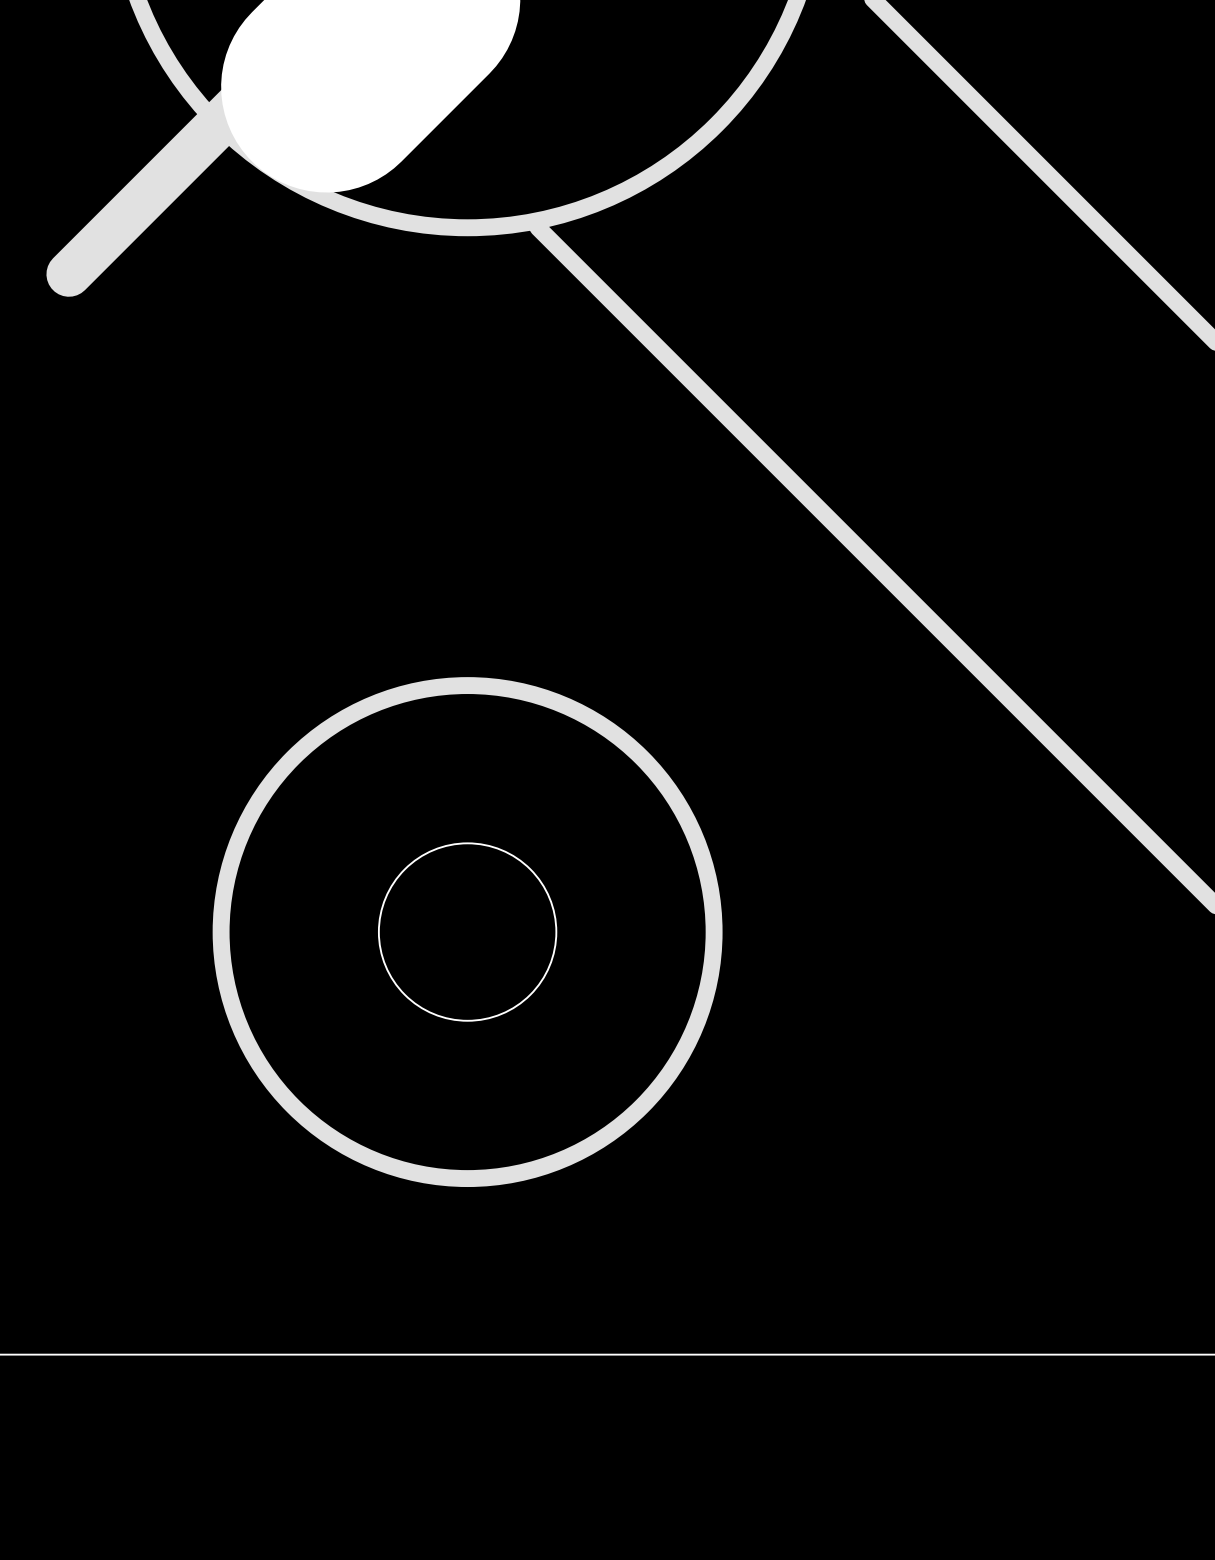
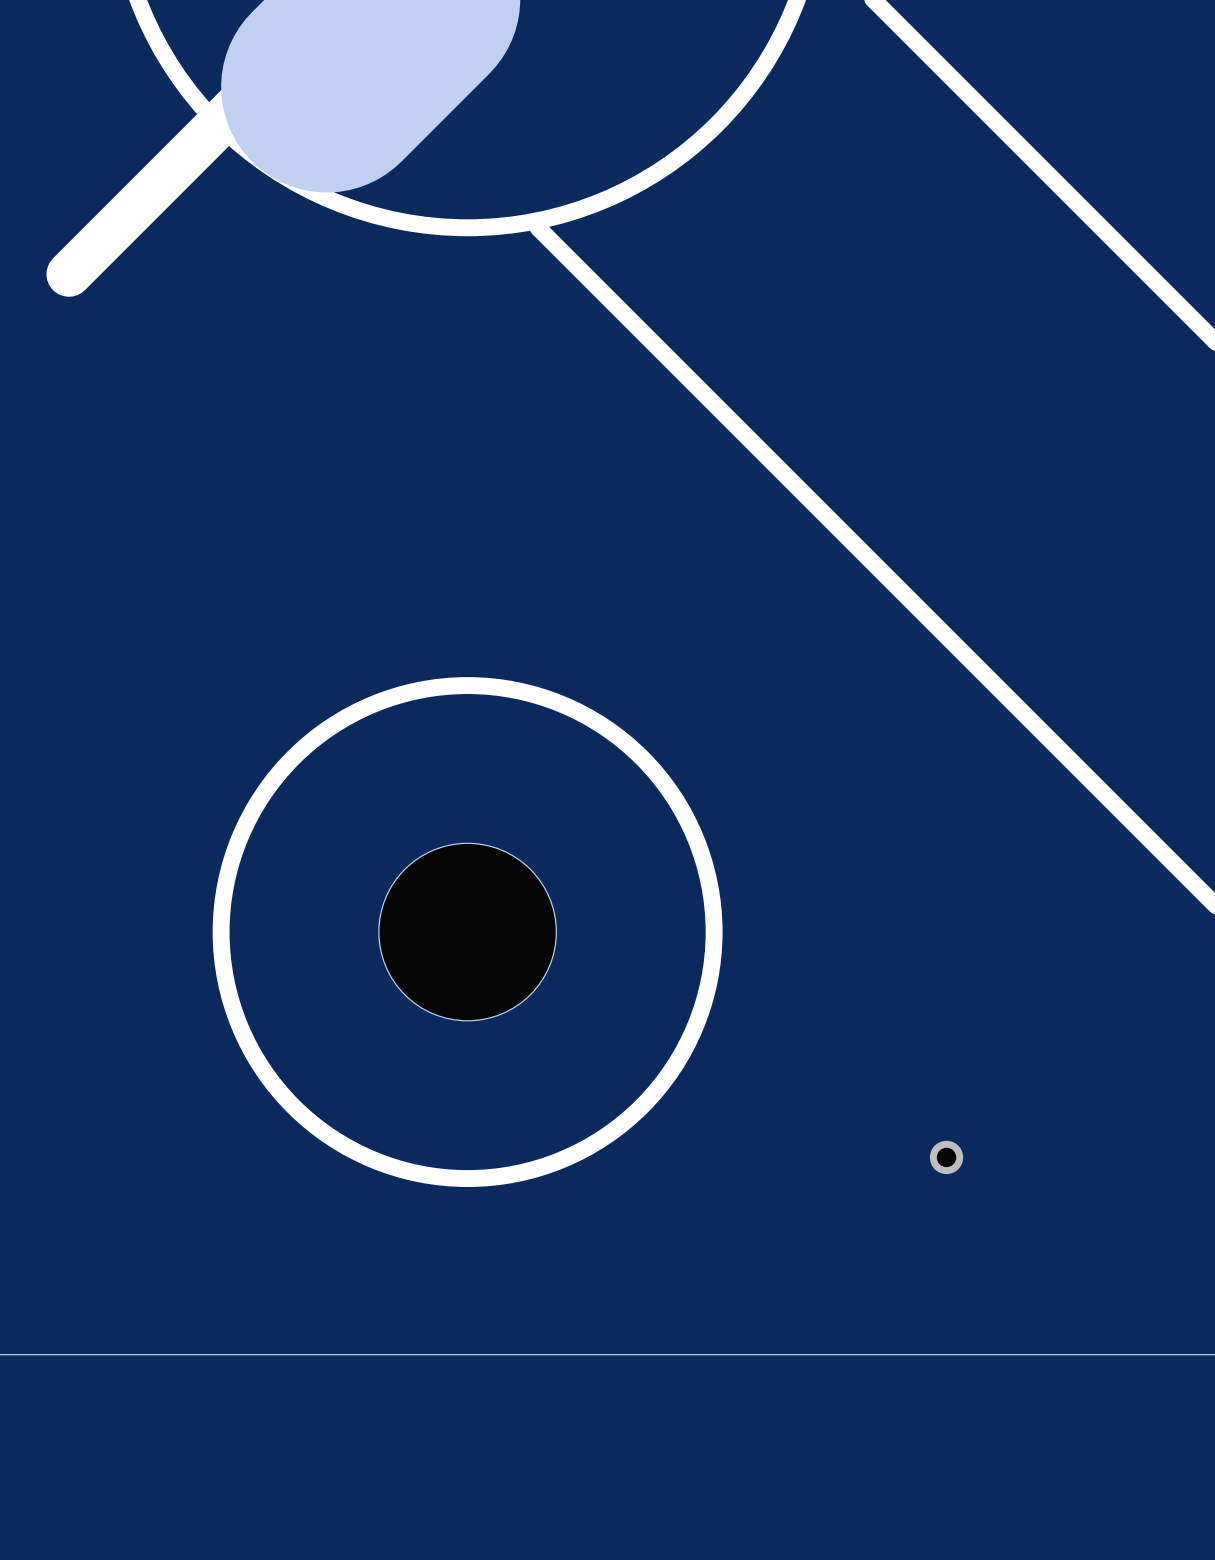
via: none -> (946, 1157)

